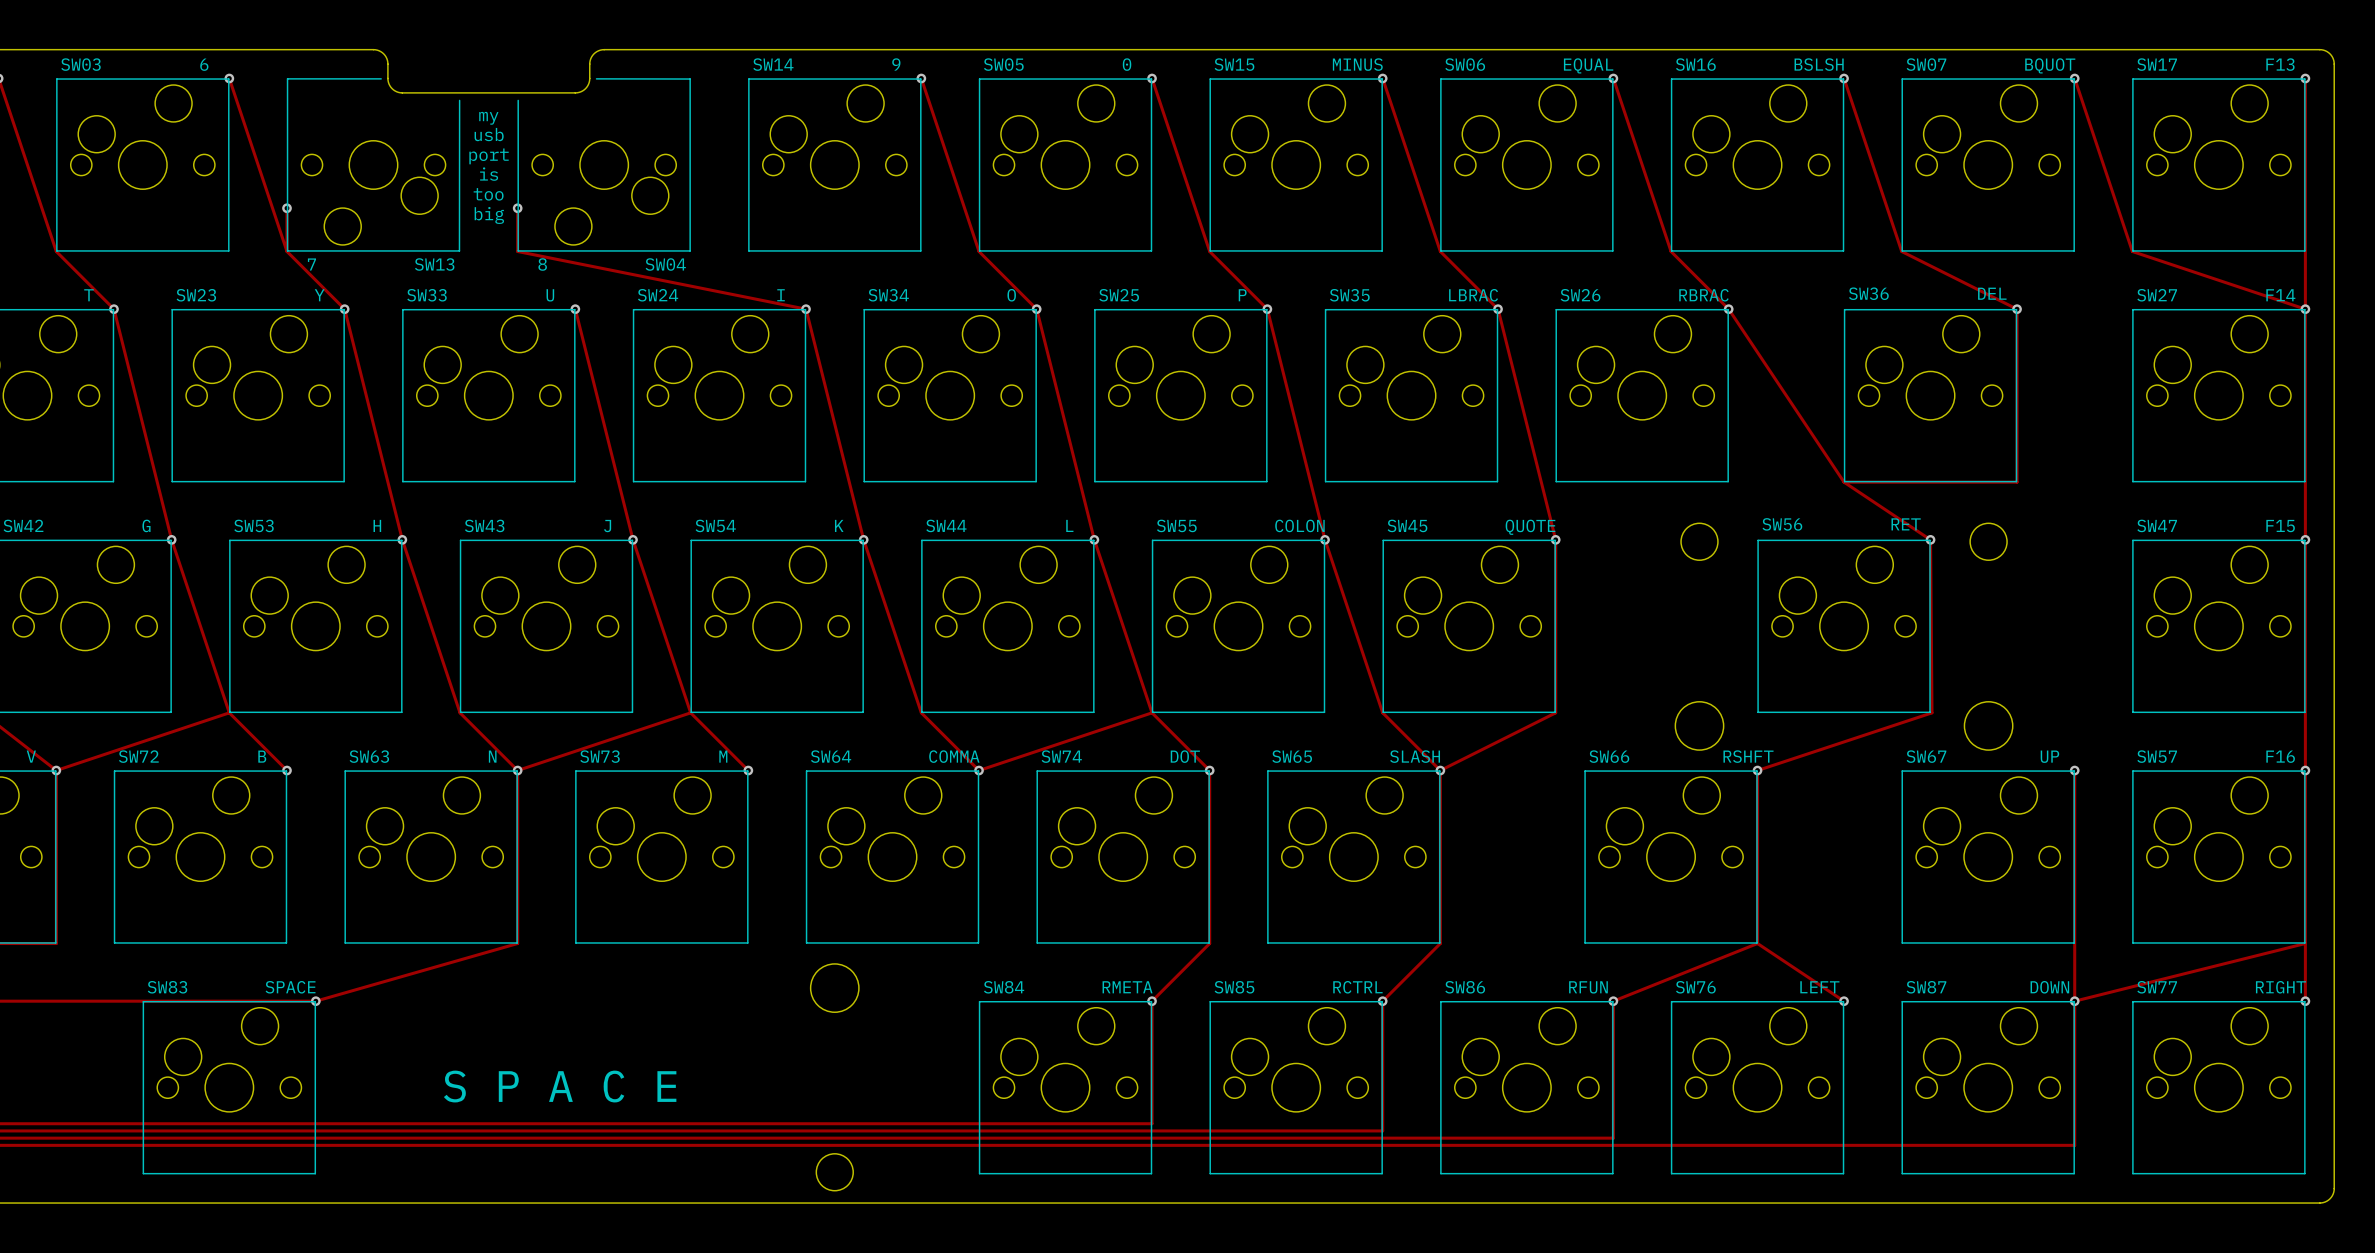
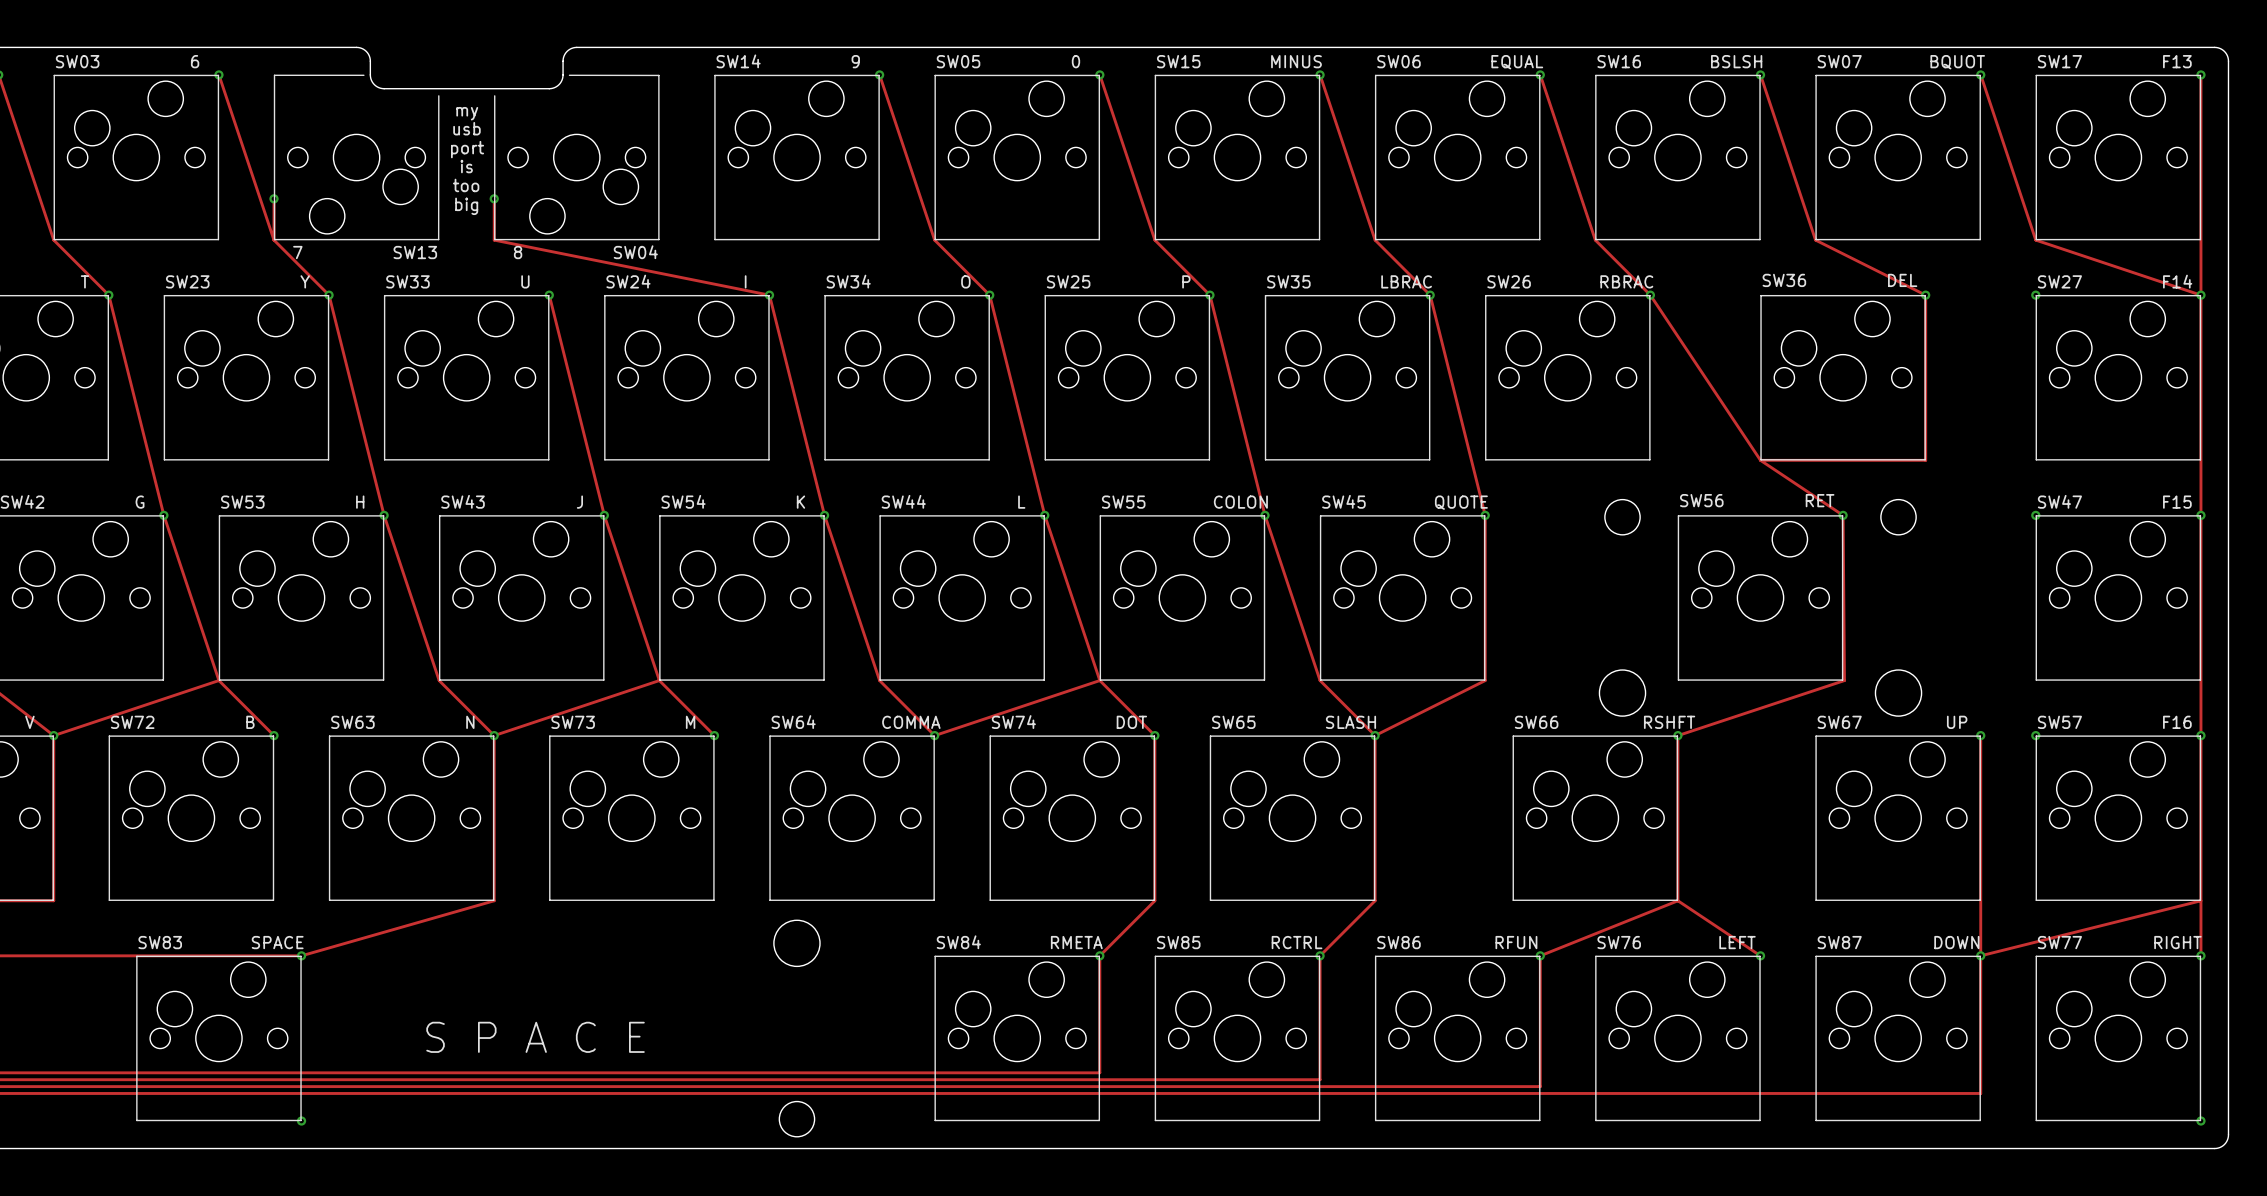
via: none -> (2035, 295)
via: none -> (2035, 515)
via: none -> (2035, 735)
via: none -> (301, 1121)
via: none -> (2200, 1121)

